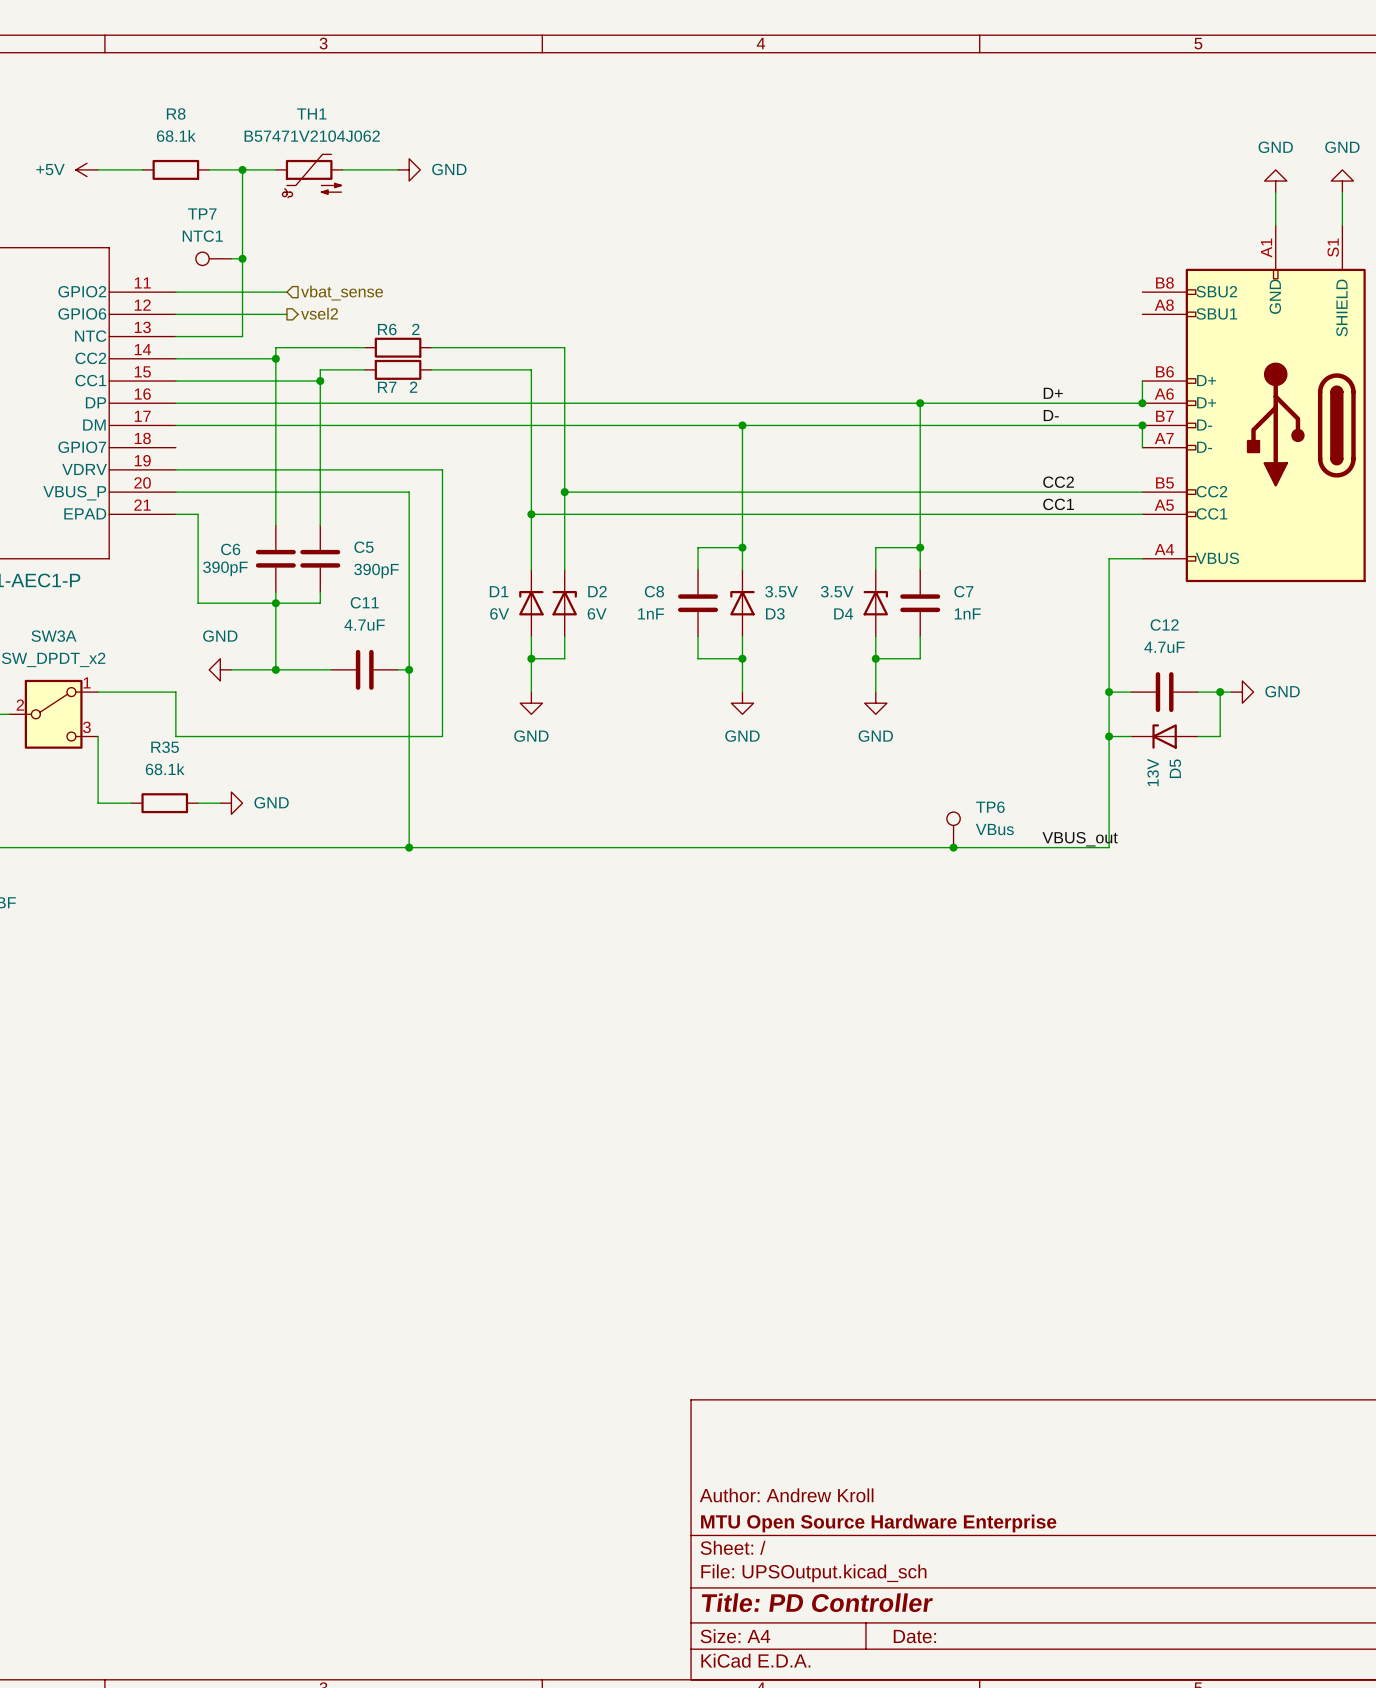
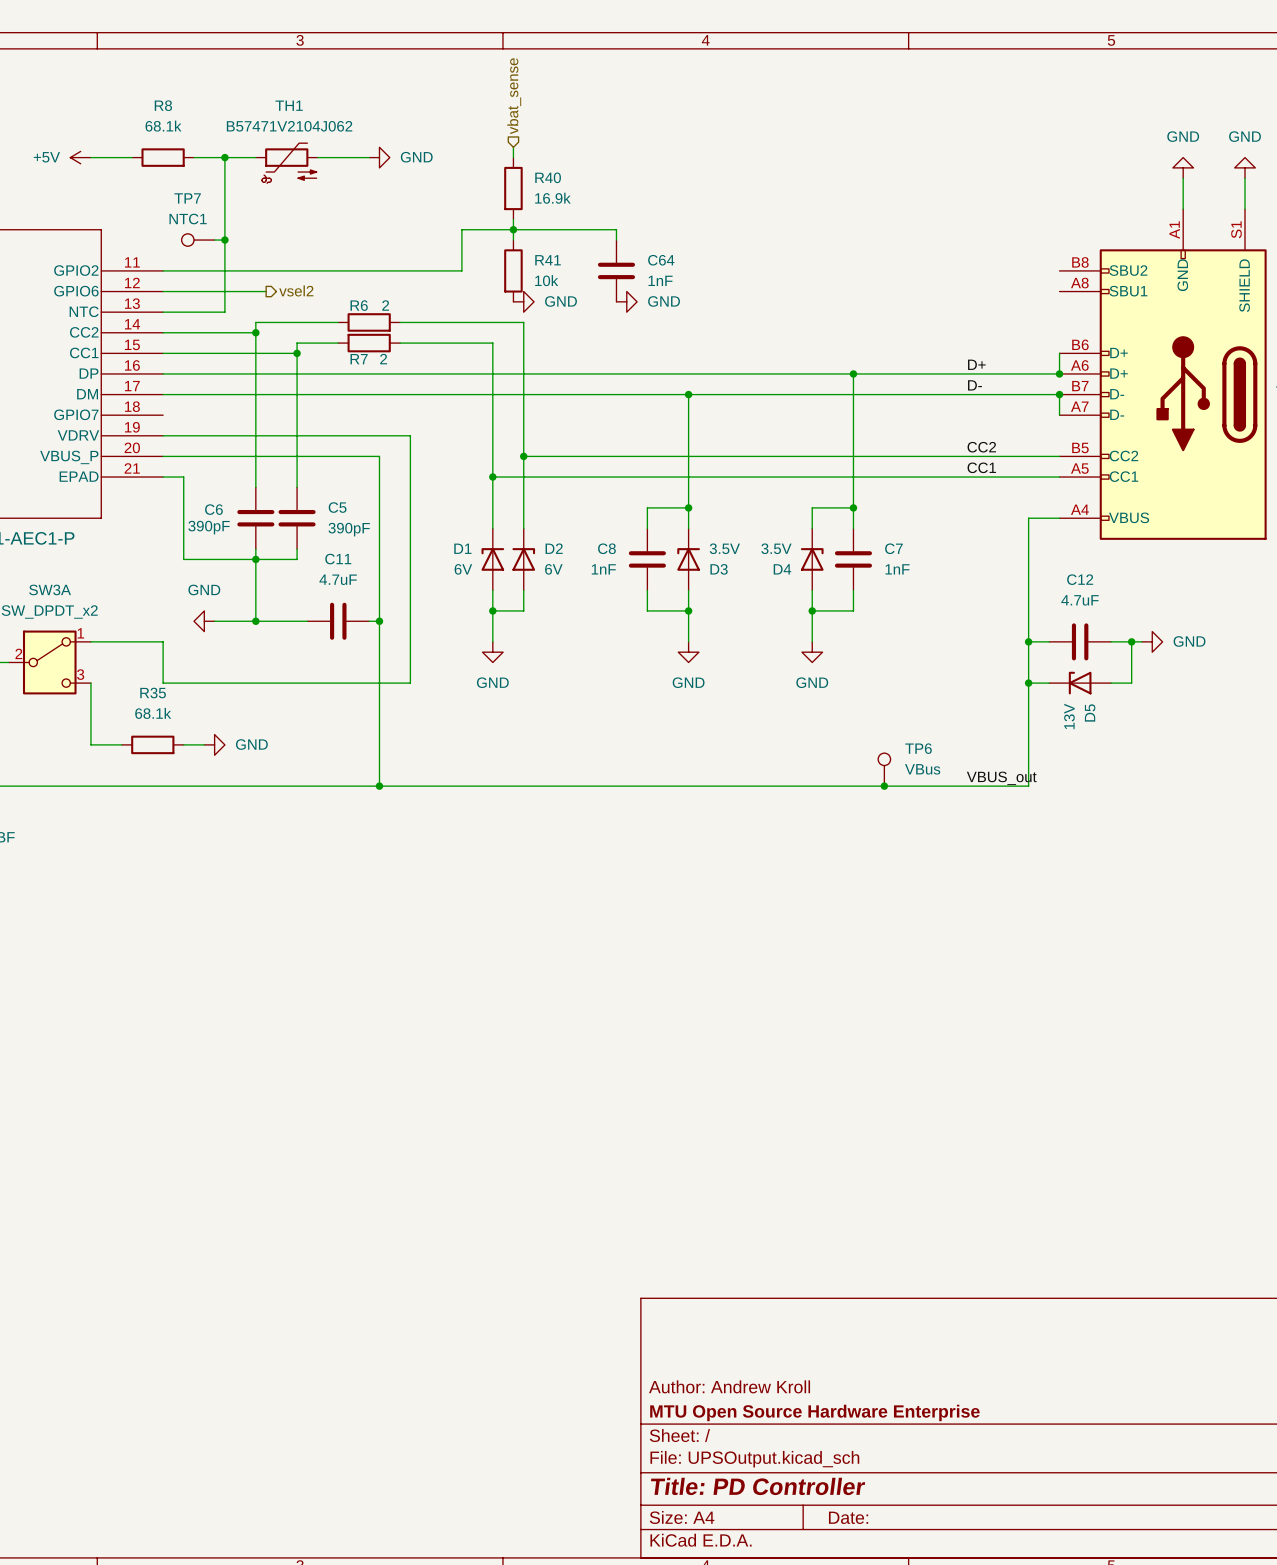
hierarchical label: none -> vbat_sense (514, 96)
wire: none -> (513, 147) (513, 157)
R40: none -> 16.9k (513, 188)
wire: none -> (513, 219) (513, 240)
junction: none -> (513, 229)
wire: none -> (616, 240) (616, 229) (461, 229) (461, 270) (266, 270)
R41: none -> 10k (513, 270)
C64: none -> 1nF (616, 270)
hierarchical label: vbat_sense (342, 293) -> none
power symbol: none -> GND (523, 301)
power symbol: none -> GND (626, 301)

